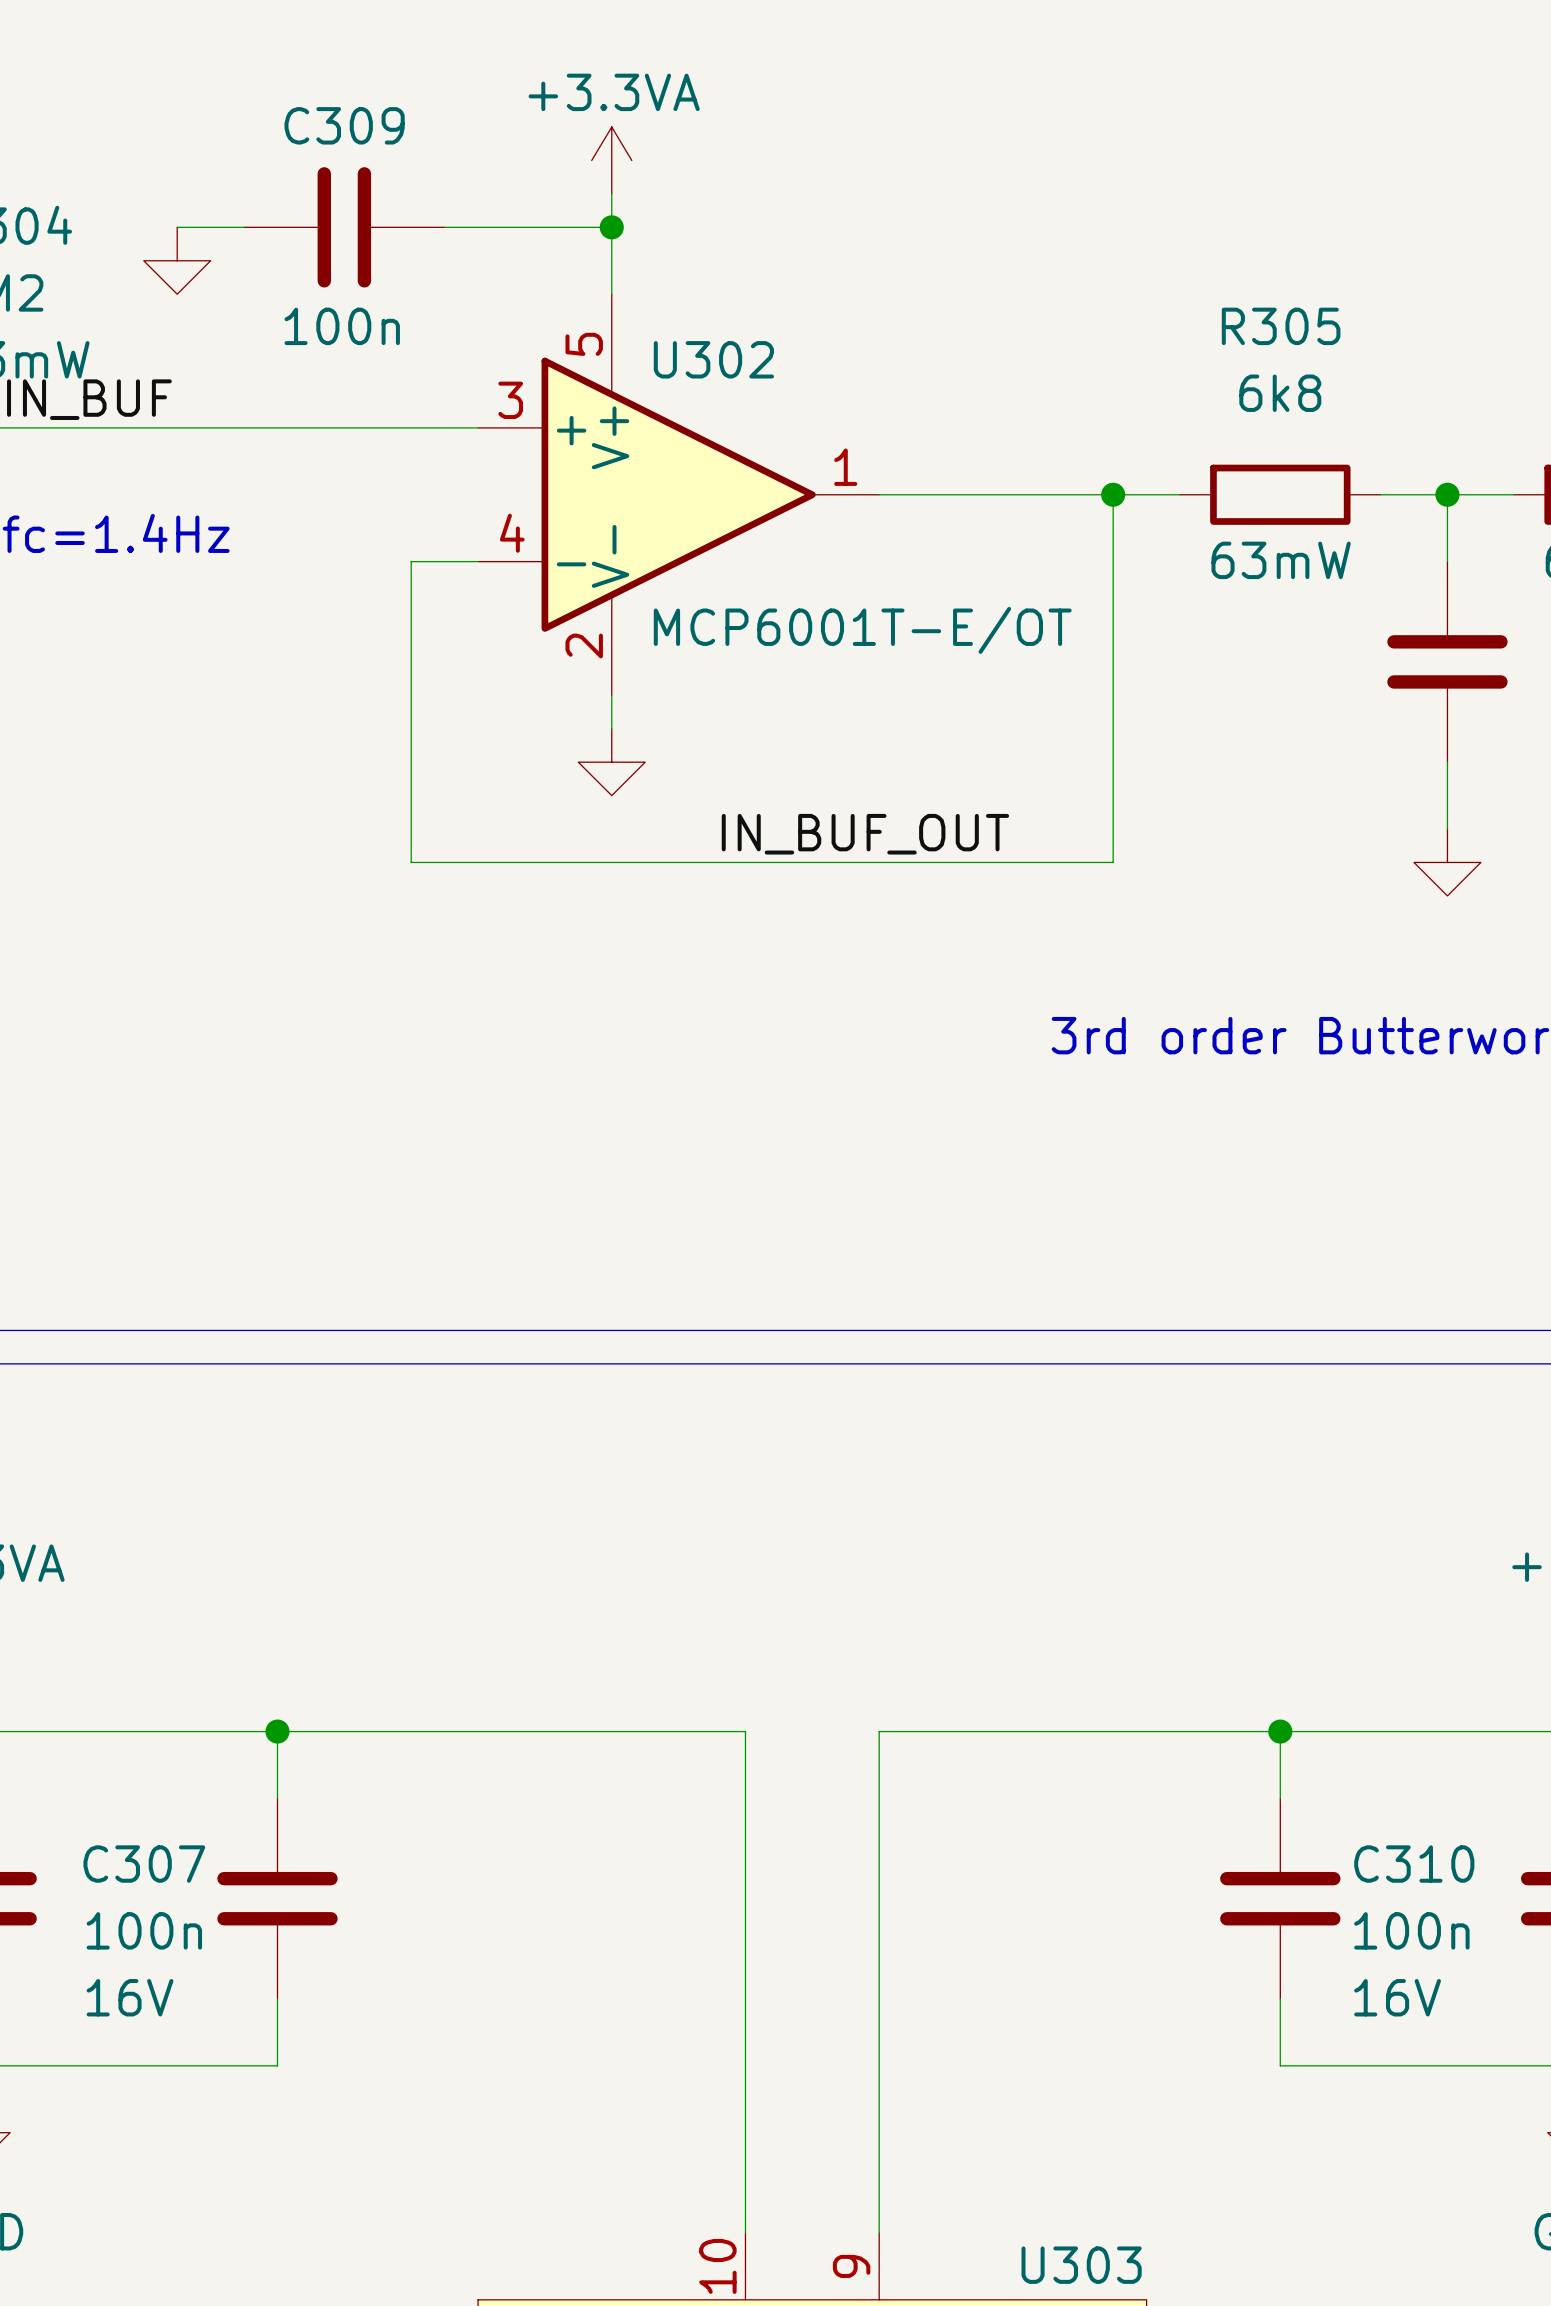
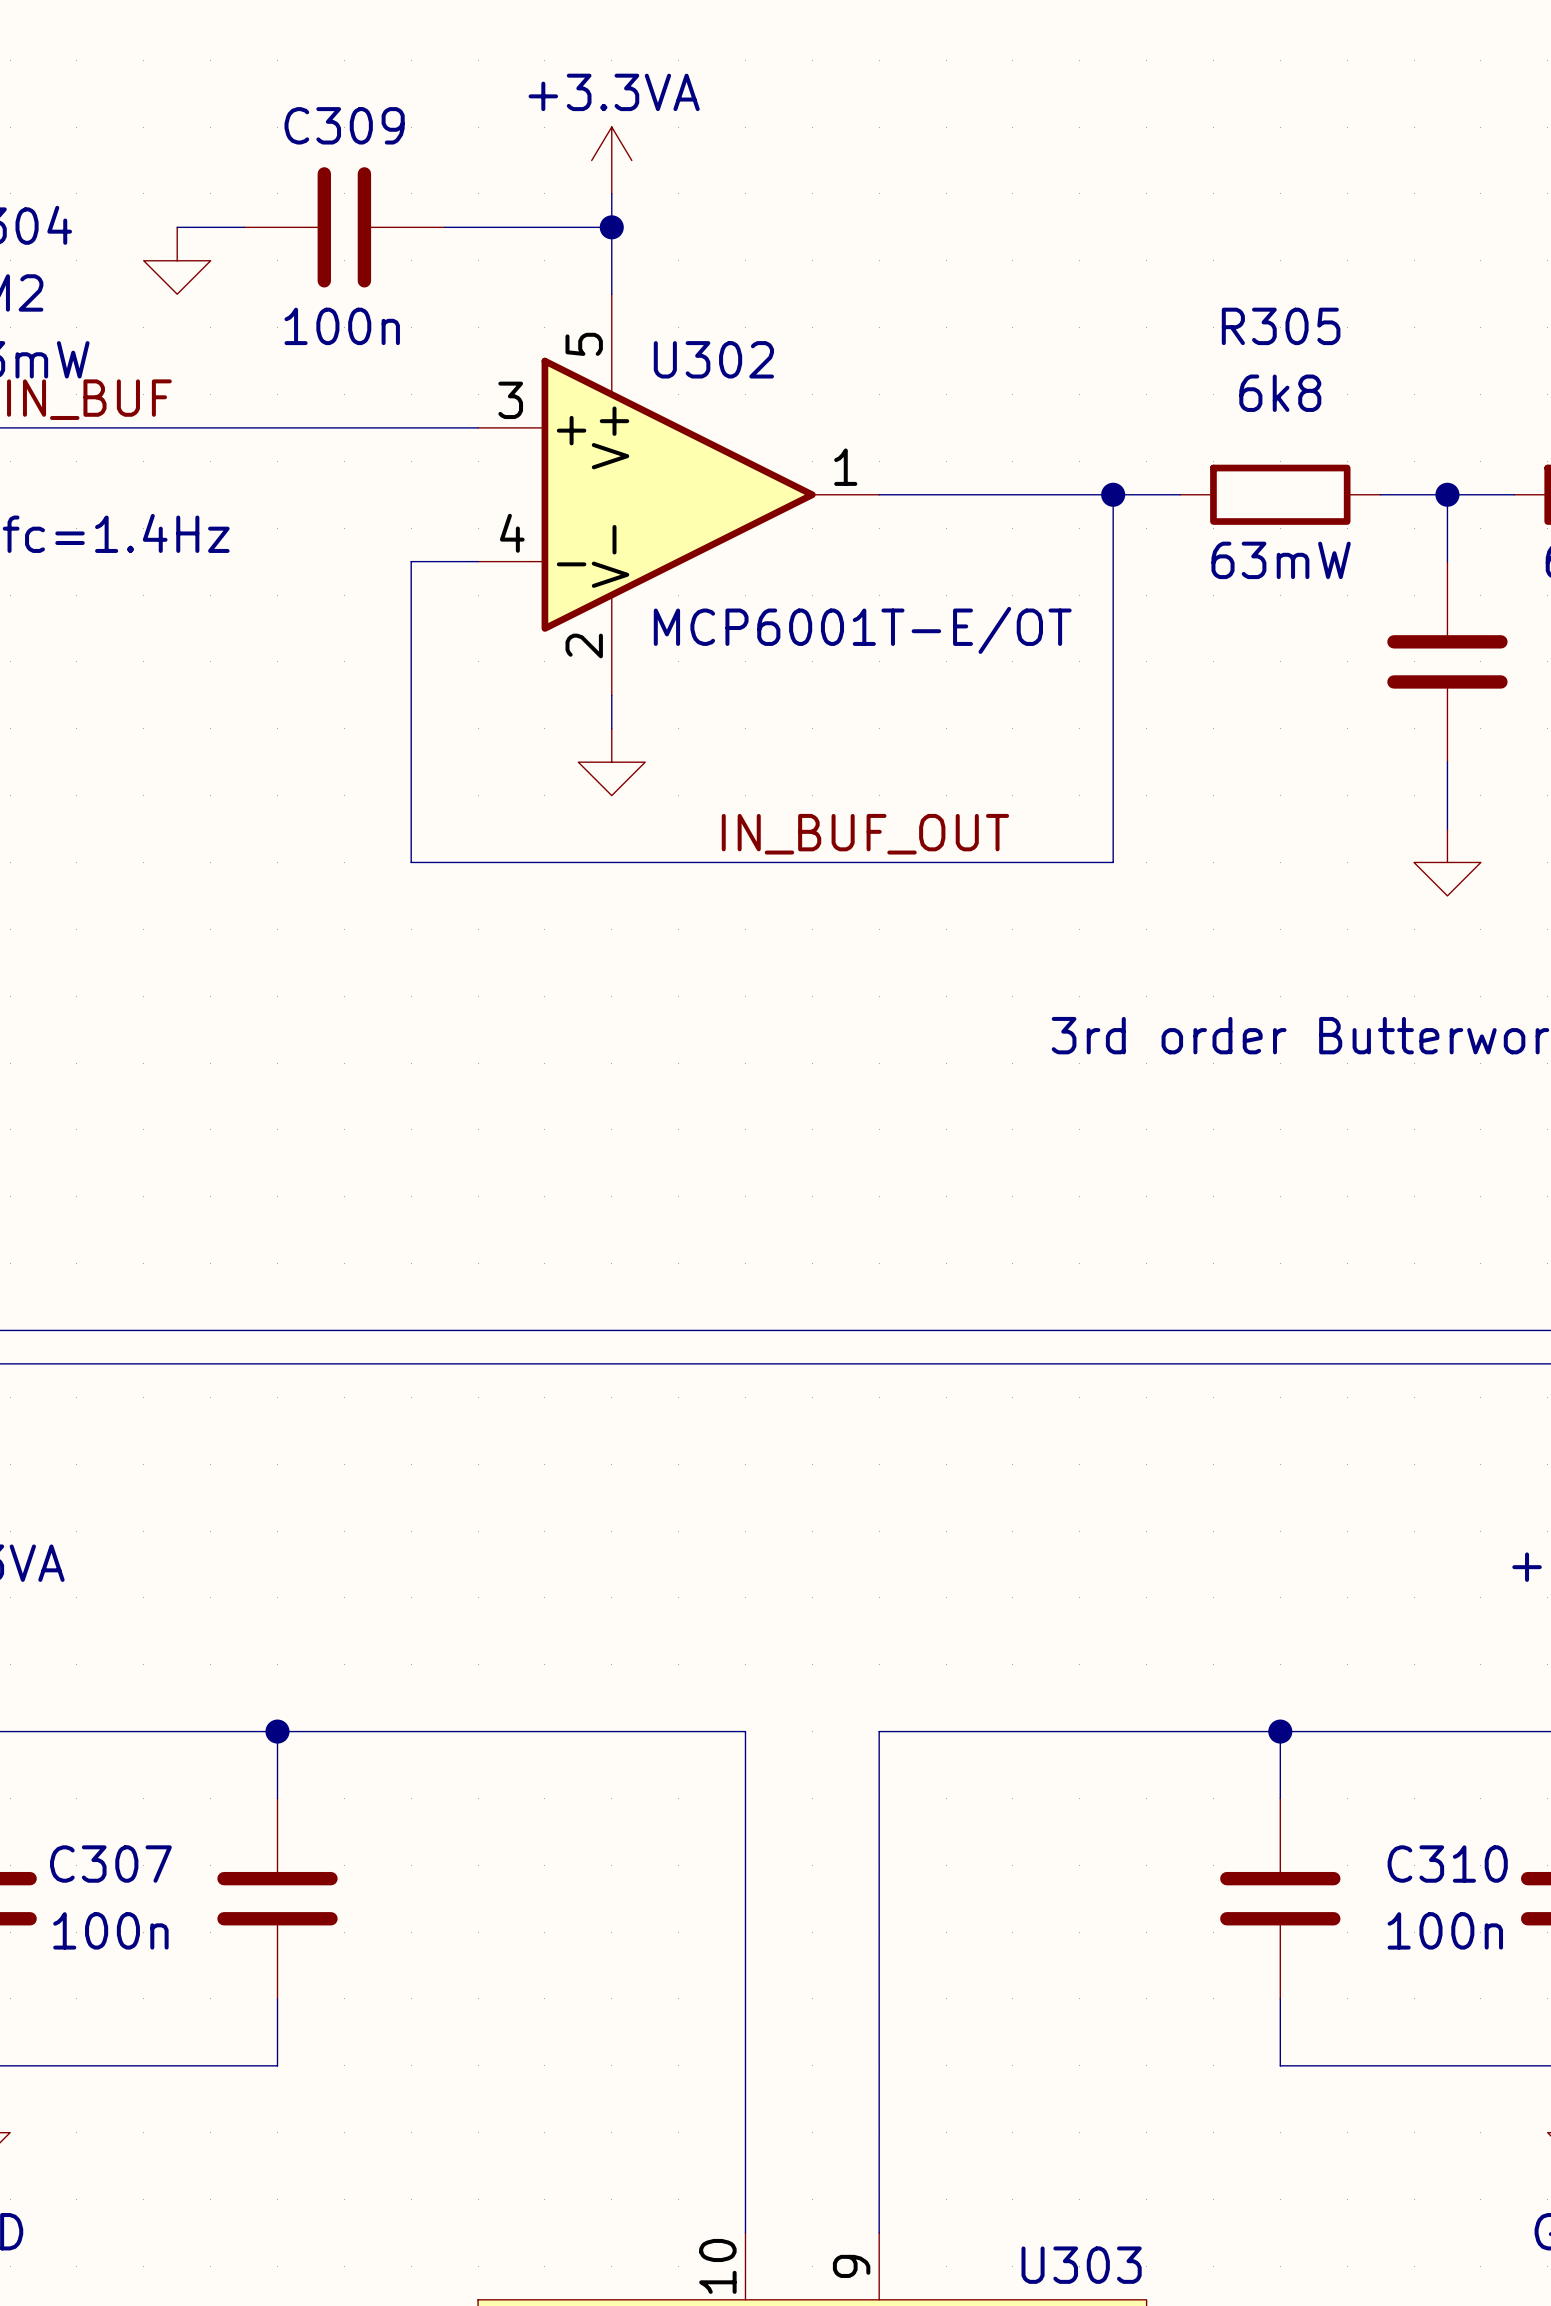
C307 name position: C307 (144, 1864) -> C307 (110, 1864)
C310 name position: C310 (1414, 1864) -> C310 (1447, 1864)
C307 value position: 100n (144, 1930) -> 100n (110, 1930)
C310 value position: 100n (1411, 1930) -> 100n (1445, 1930)
C307 text: 16V (130, 1997) -> none
C310 text: 16V (1397, 1997) -> none

